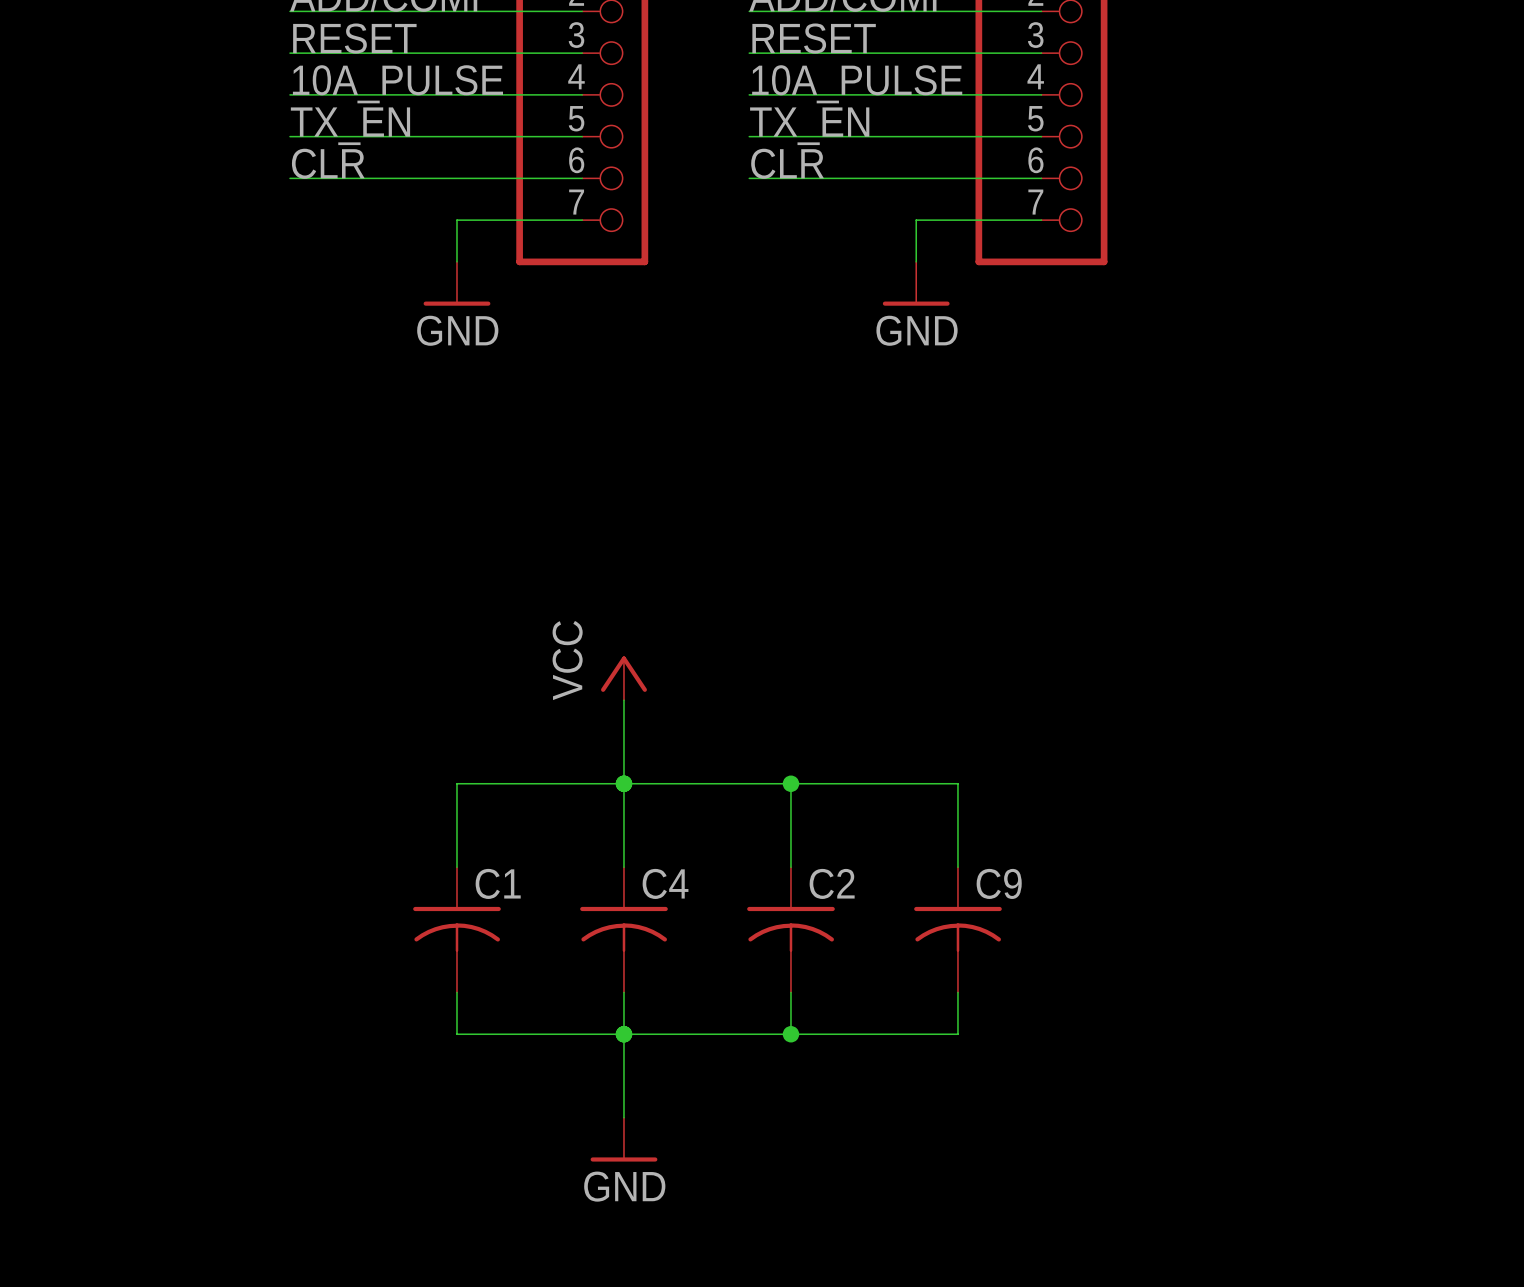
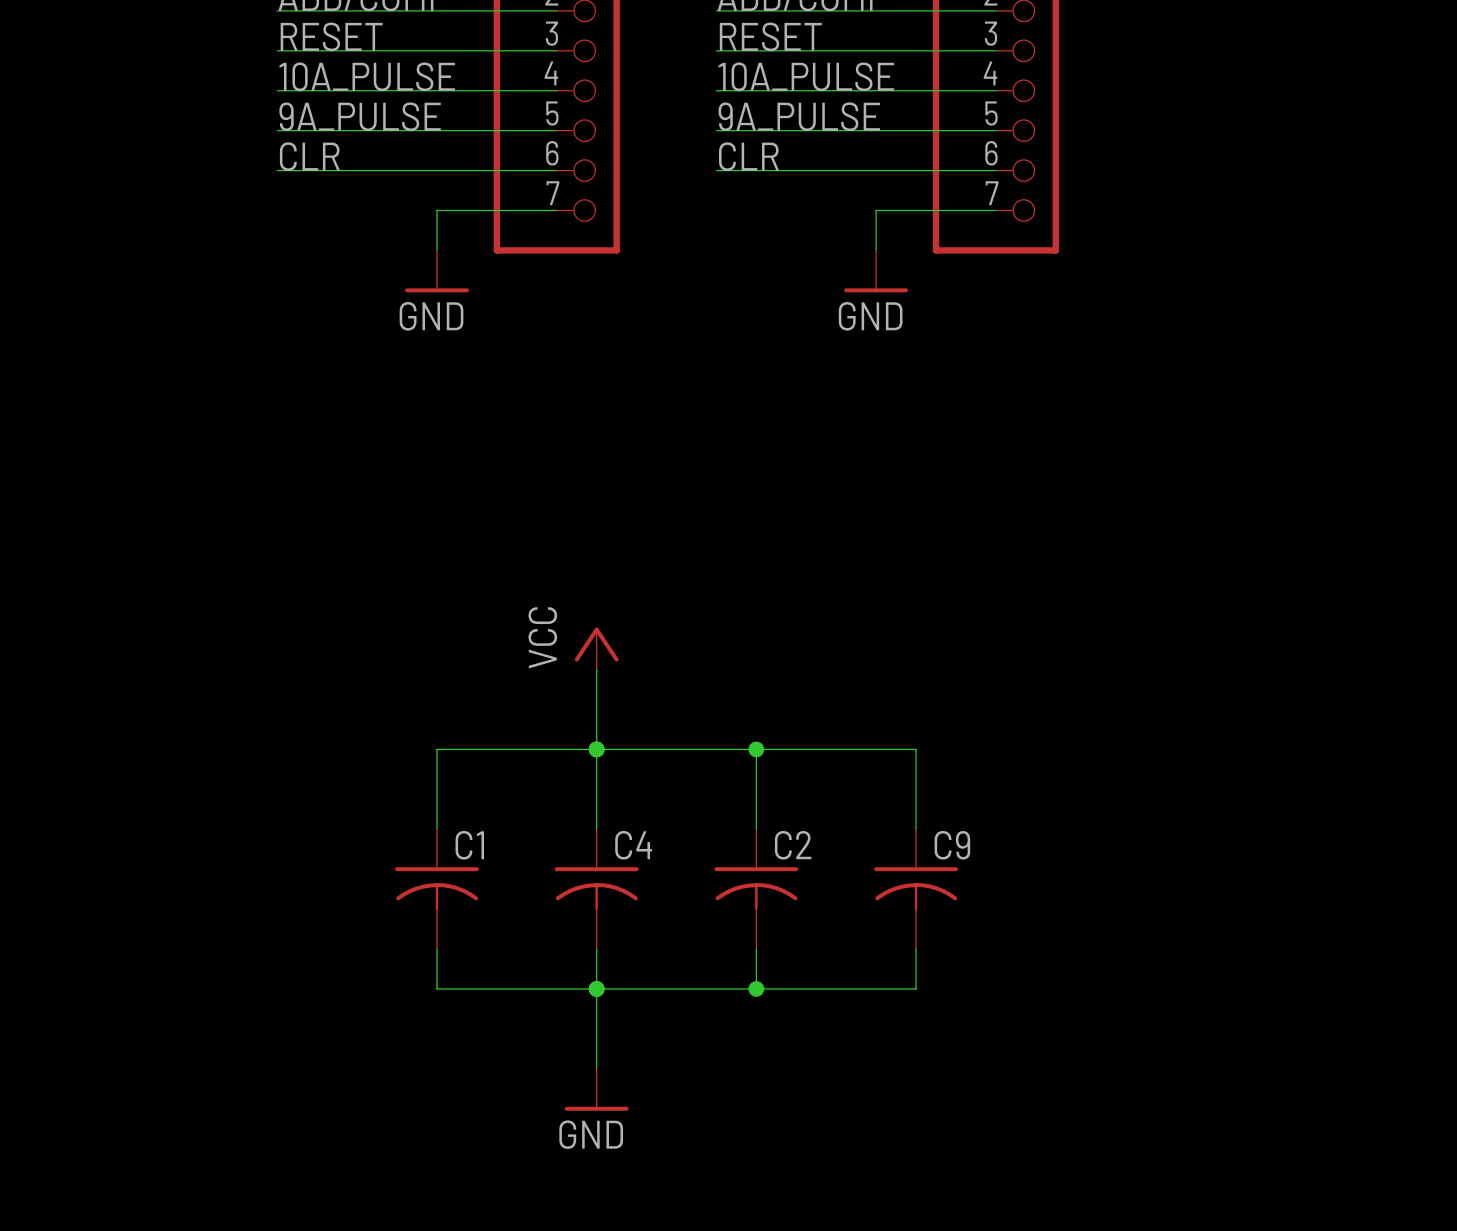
label: TX_EN (350, 126) -> 9A_PULSE (360, 116)
label: TX_EN (809, 126) -> 9A_PULSE (799, 116)

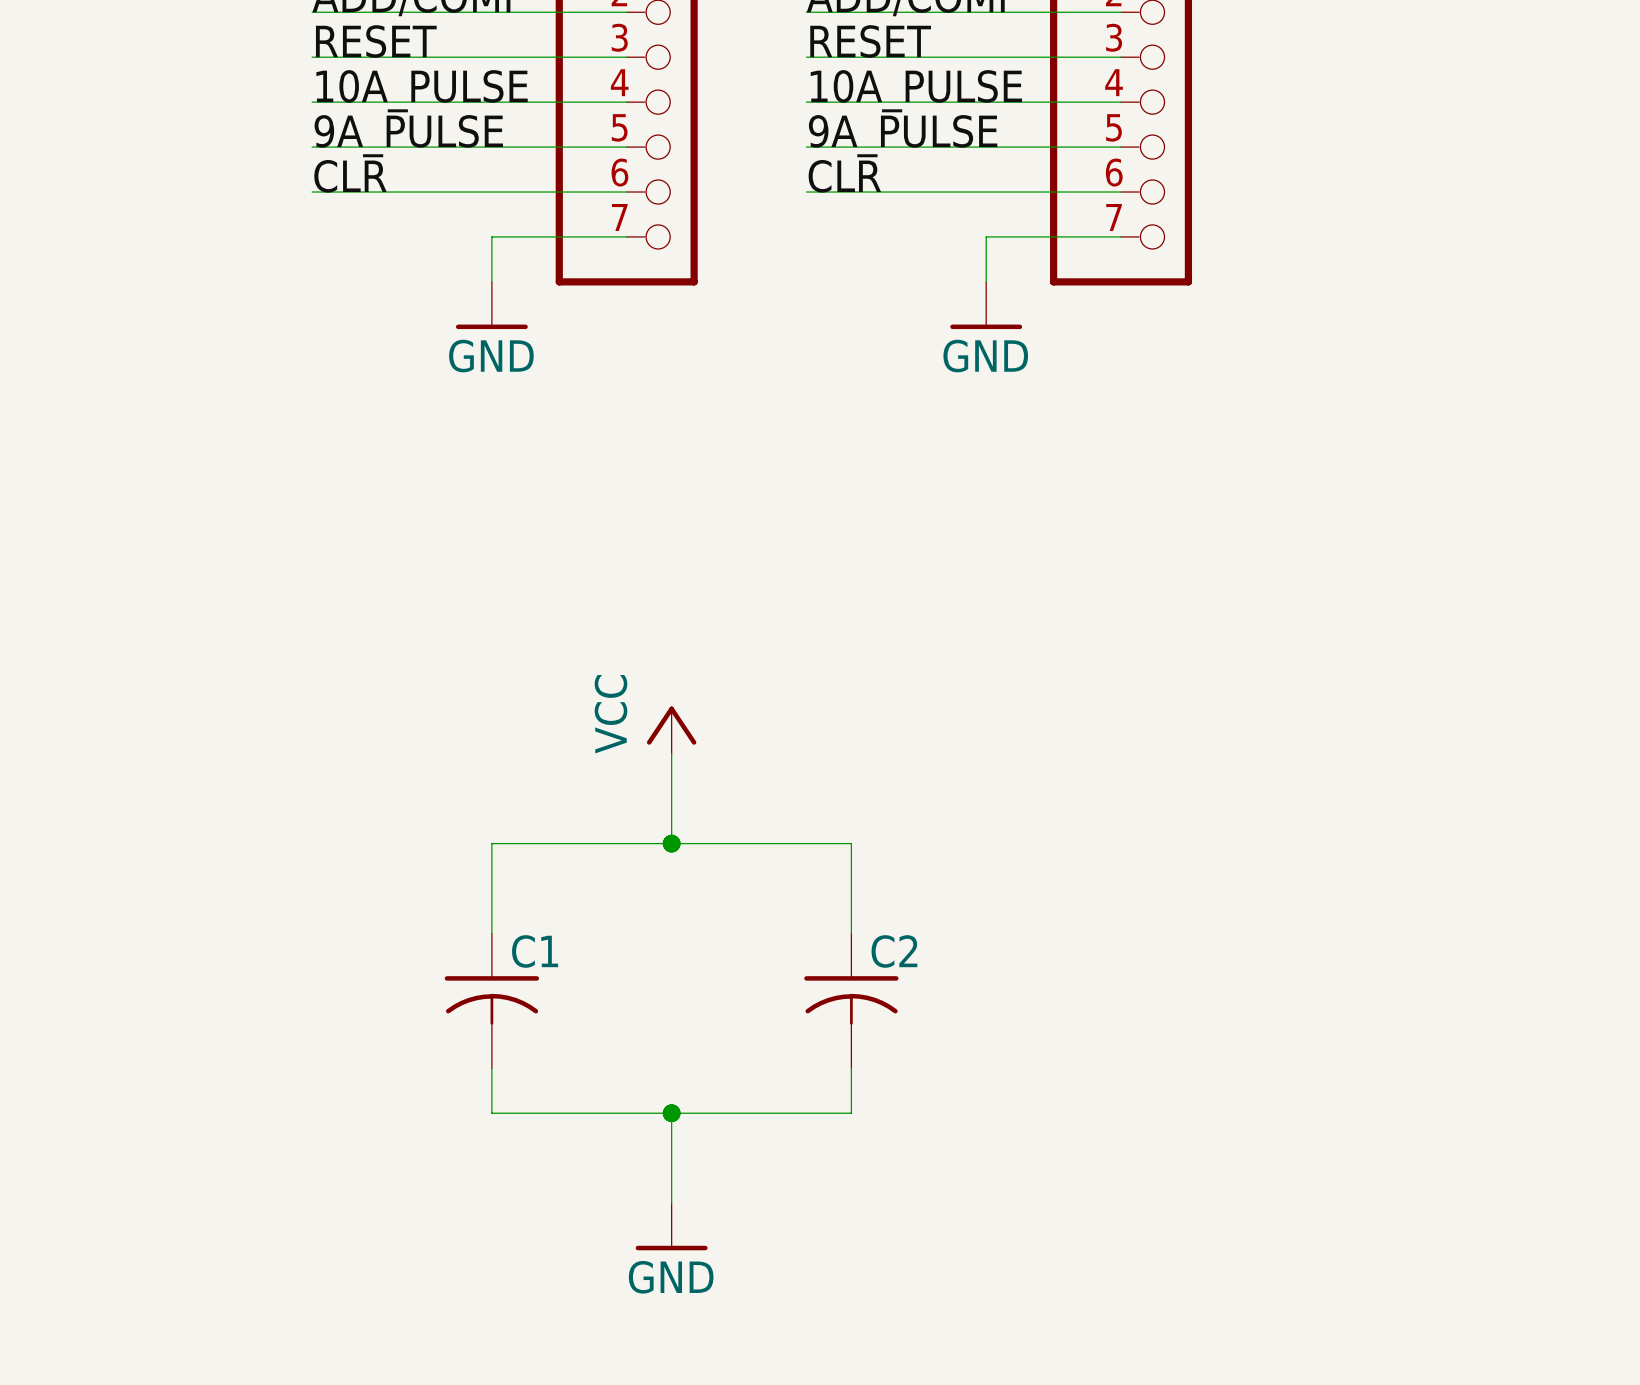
wire: (596, 749) (596, 829) -> none
wire: (756, 749) (916, 749) (916, 829) -> none
junction: (756, 749) -> none
C4: (596, 889) -> none
C9: (916, 889) -> none
wire: (596, 949) (596, 988) -> none
wire: (916, 949) (916, 988) (756, 988) -> none
junction: (756, 988) -> none

